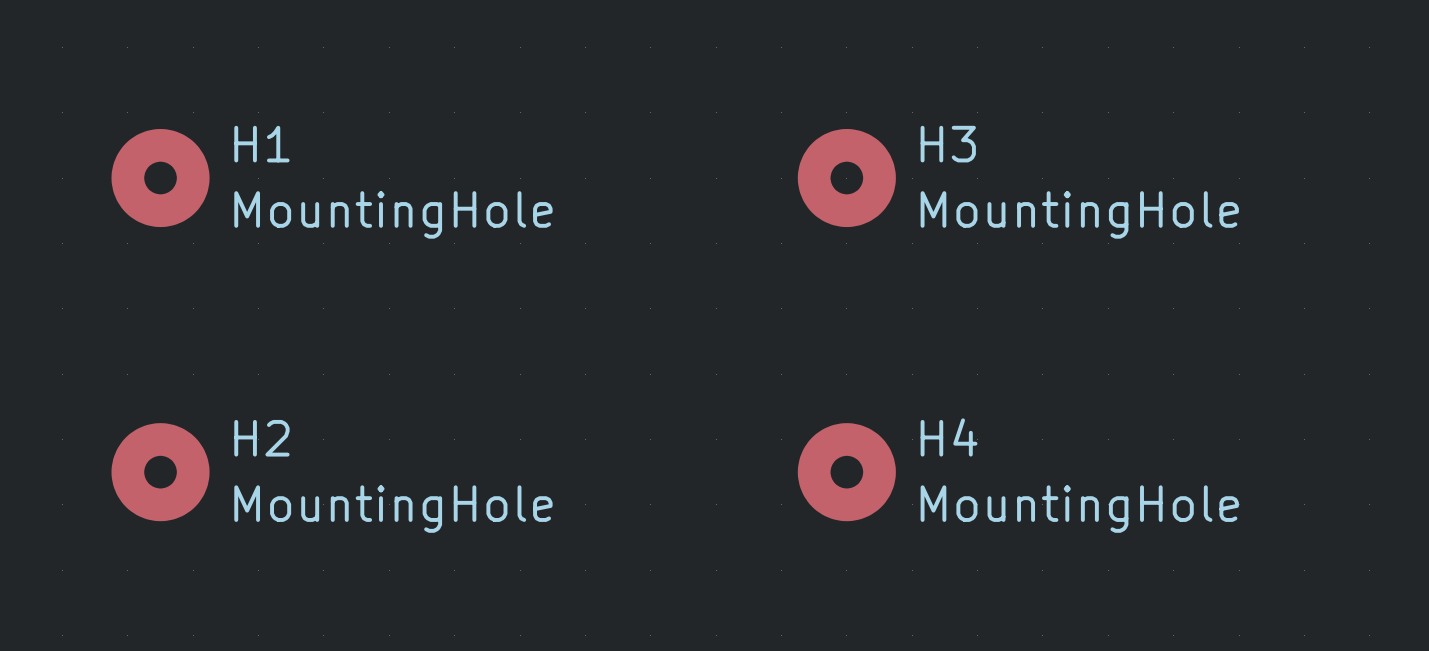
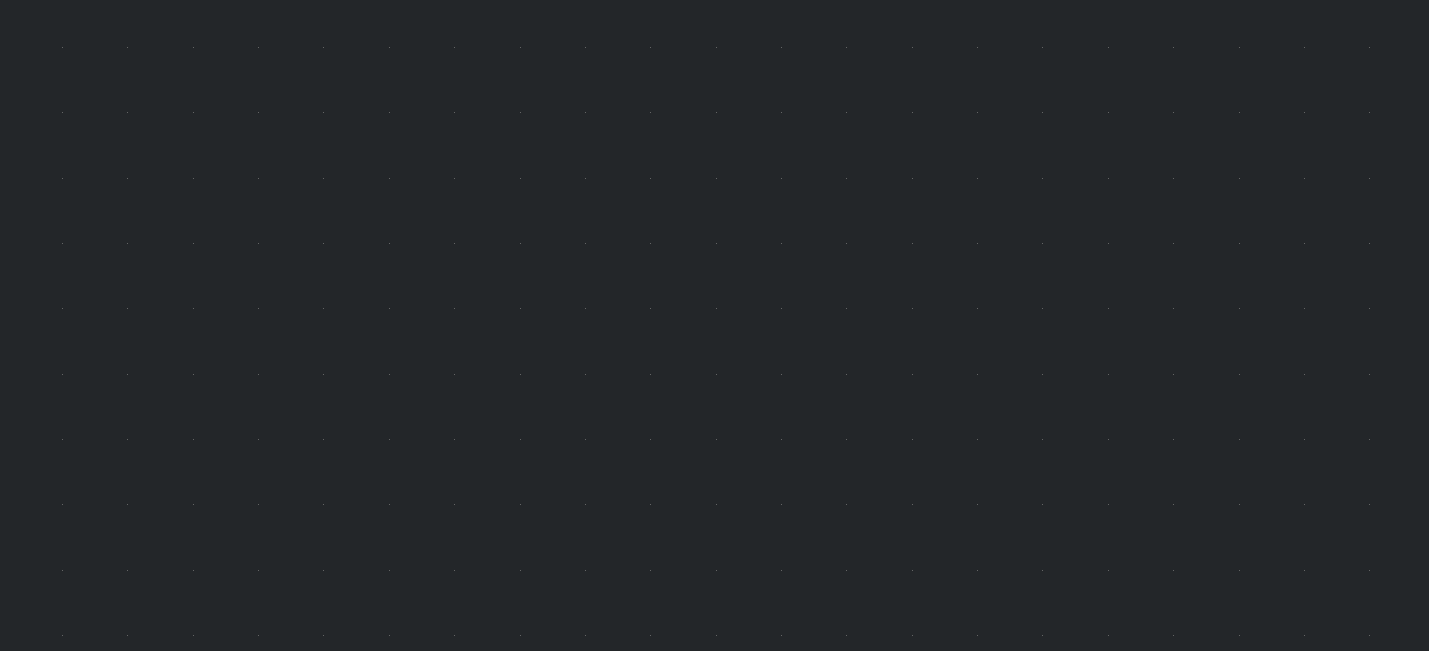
H1: MountingHole (160, 178) -> none
H3: MountingHole (846, 178) -> none
H2: MountingHole (160, 472) -> none
H4: MountingHole (846, 472) -> none

